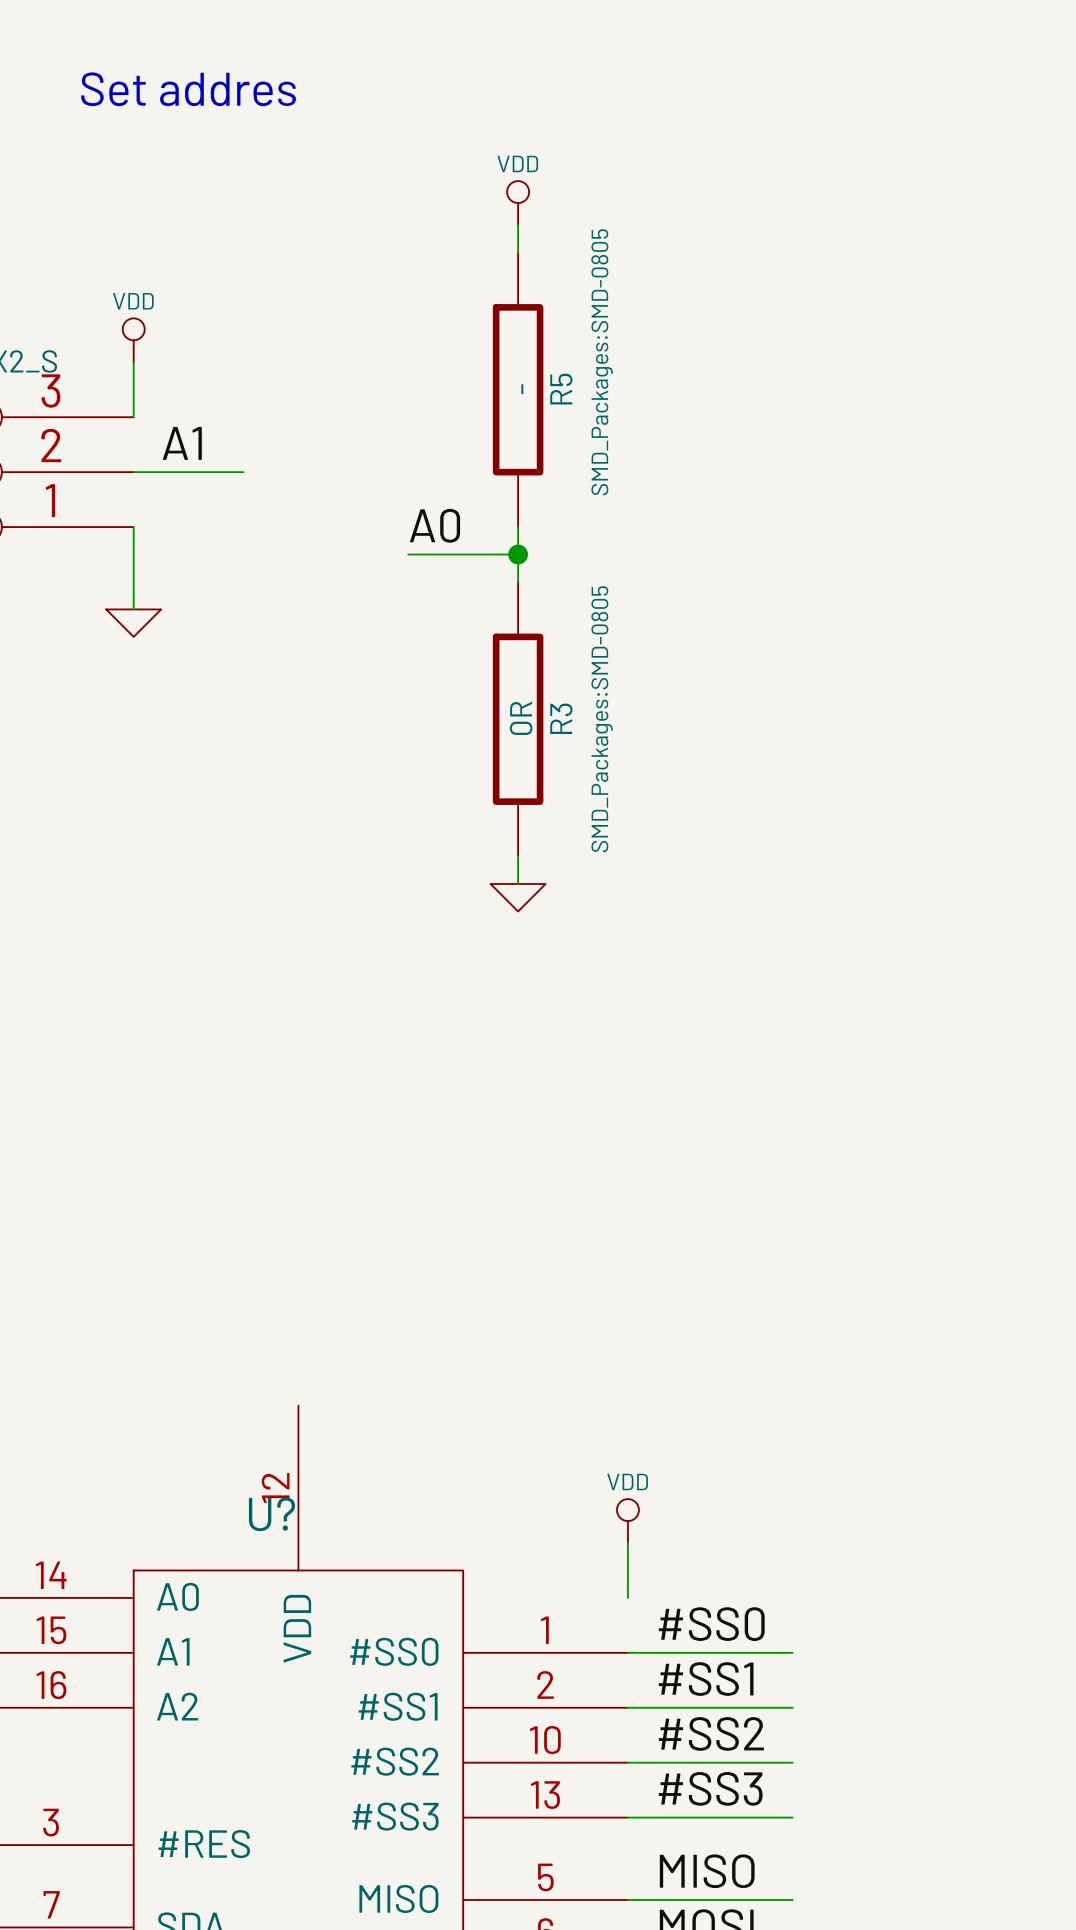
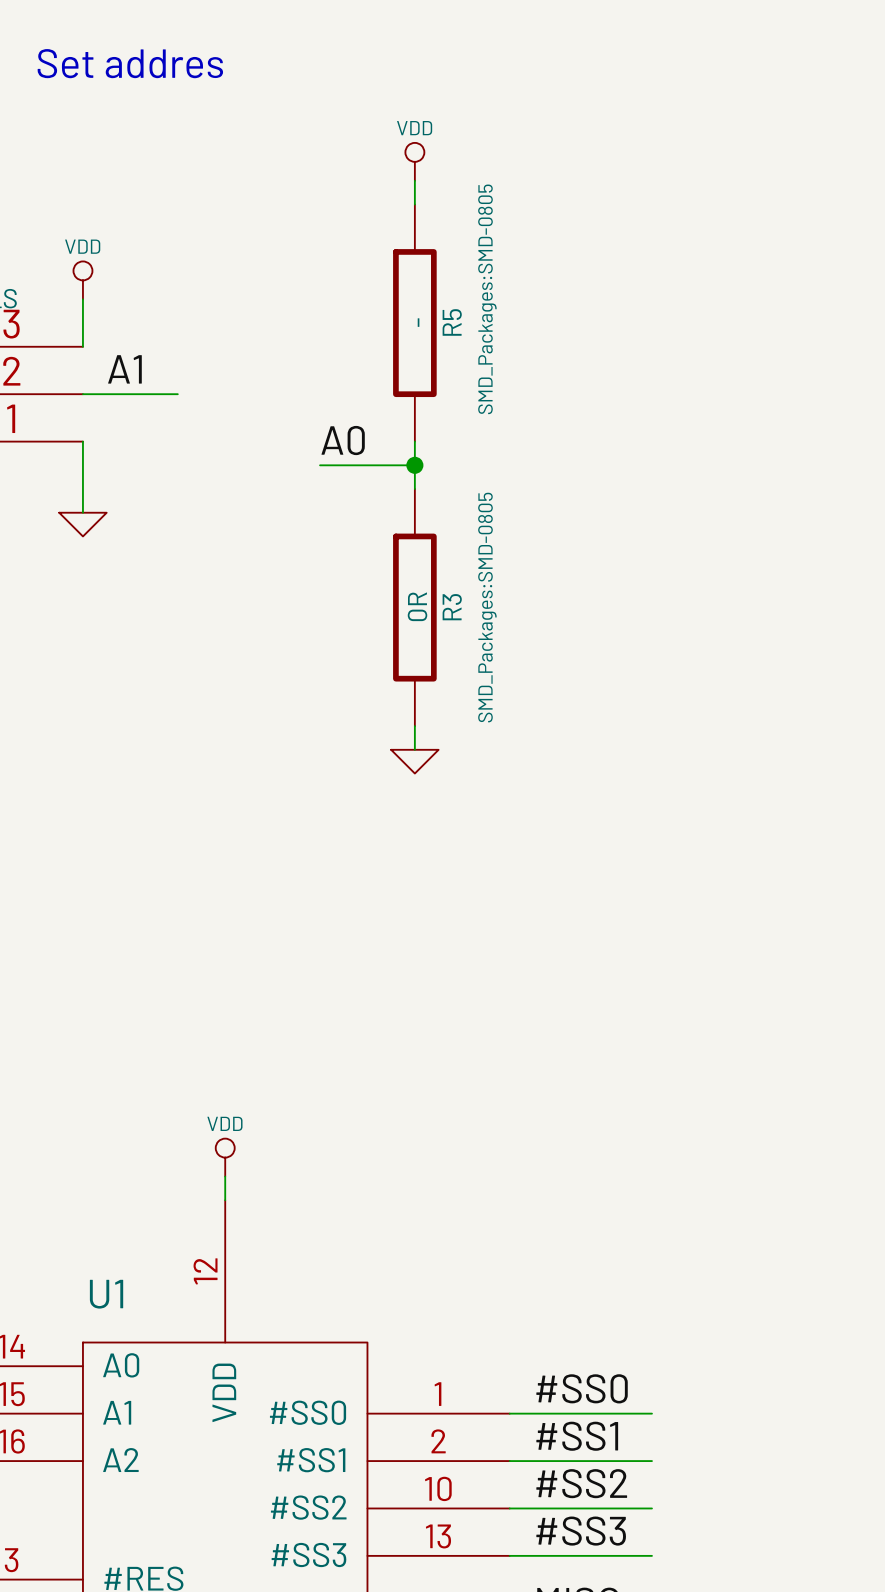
wire: none -> (225, 1176) (225, 1200)
U? name: U? (271, 1514) -> U1 (106, 1294)
power symbol position: VDD (627, 1521) -> VDD (225, 1157)
wire: (627, 1543) (627, 1597) -> none

